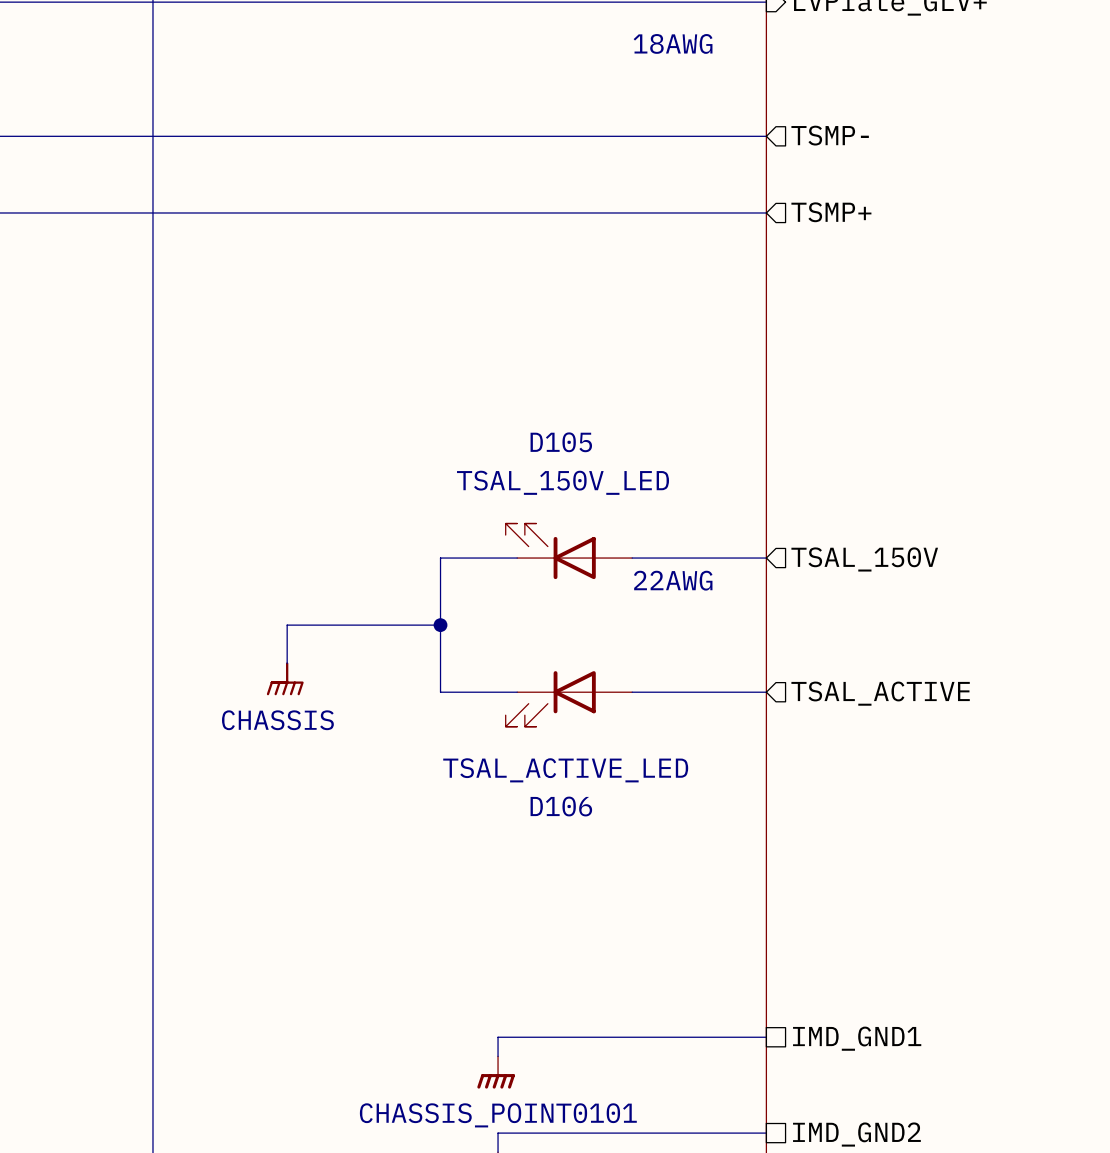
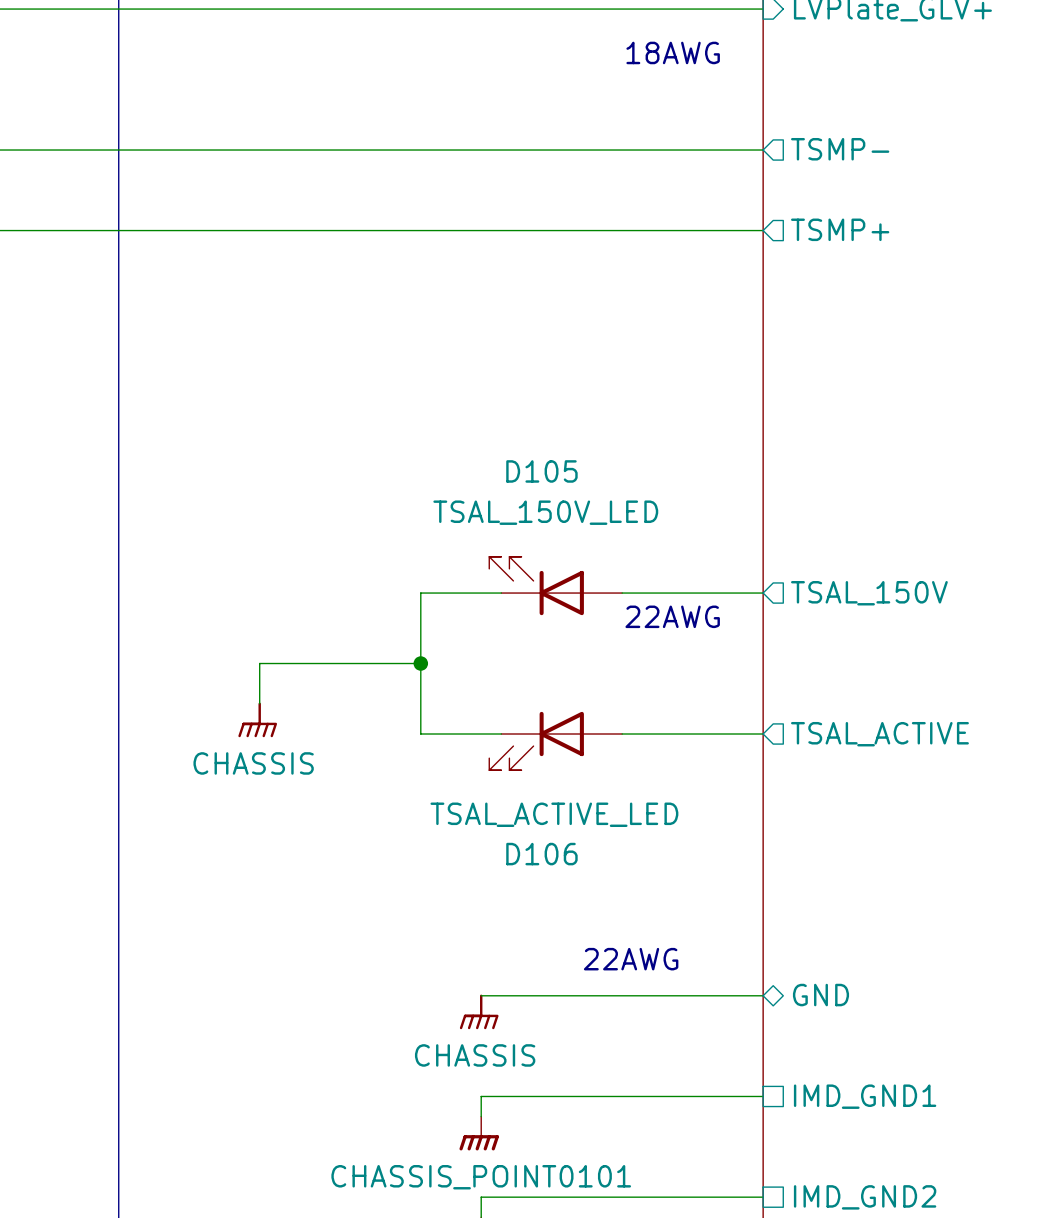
text: none -> 22AWG (631, 959)
sheet pin: none -> GND (820, 995)
wire: none -> (481, 995) (763, 995)
part: none -> CHASSIS (479, 1011)

